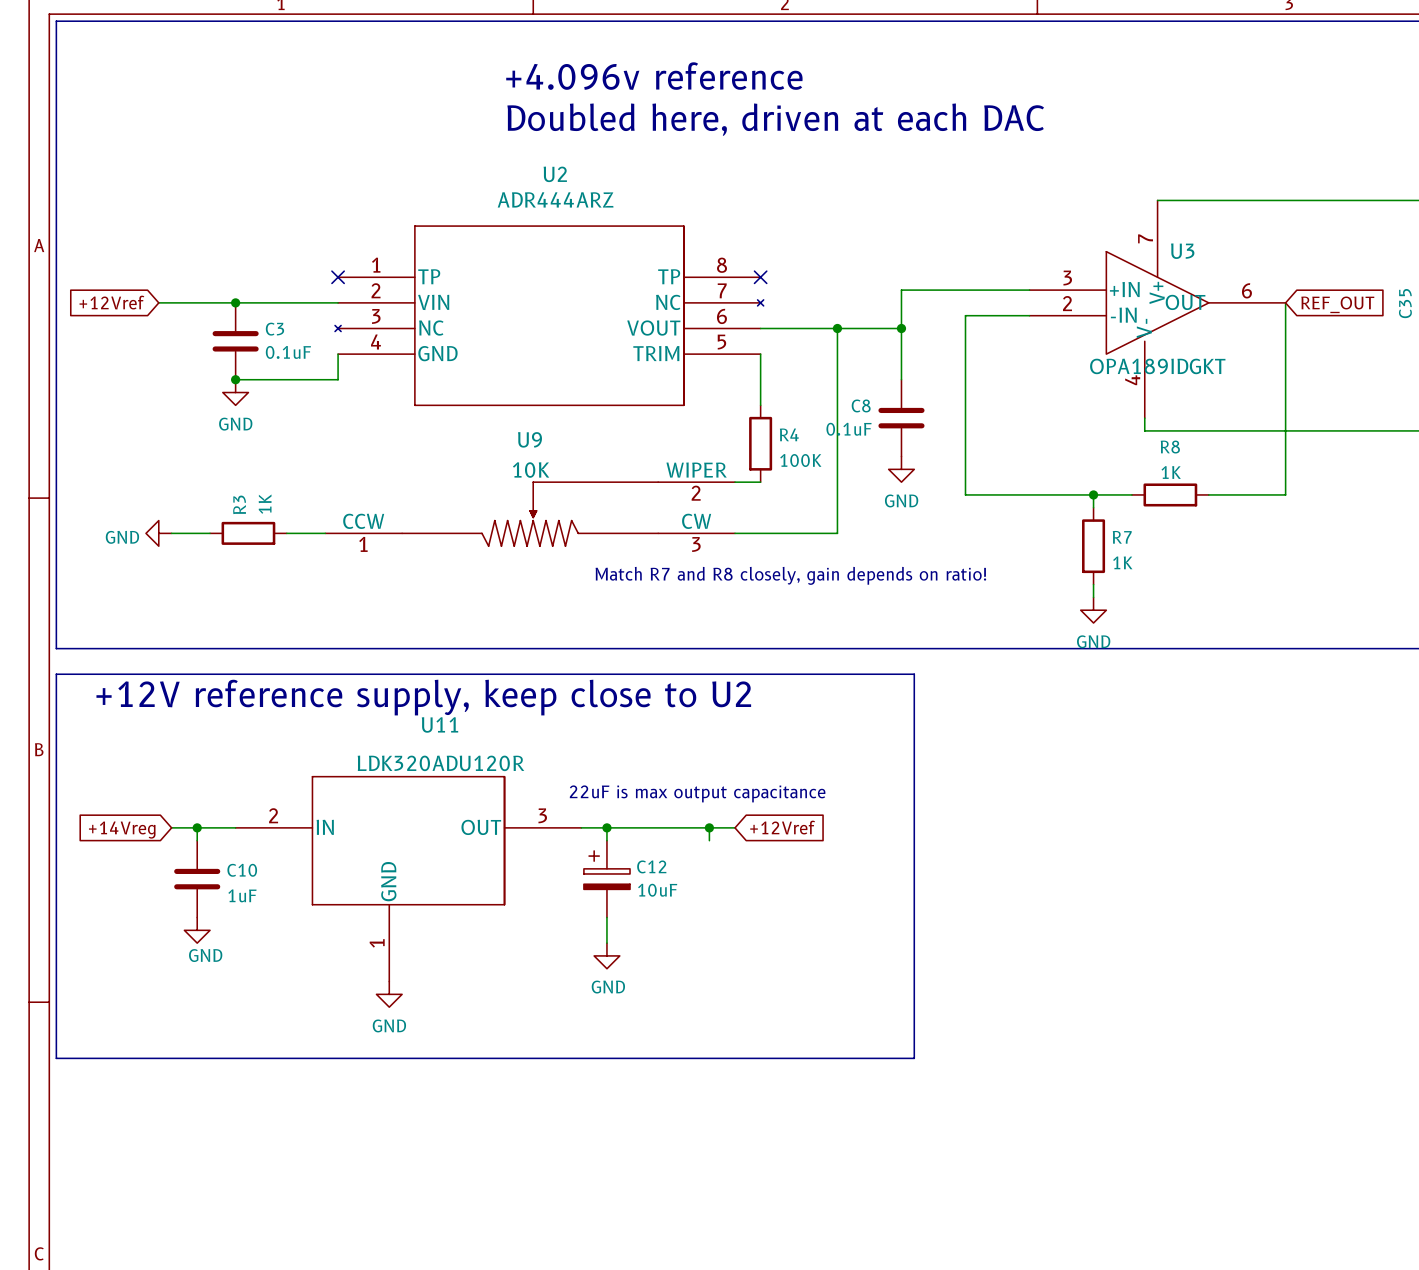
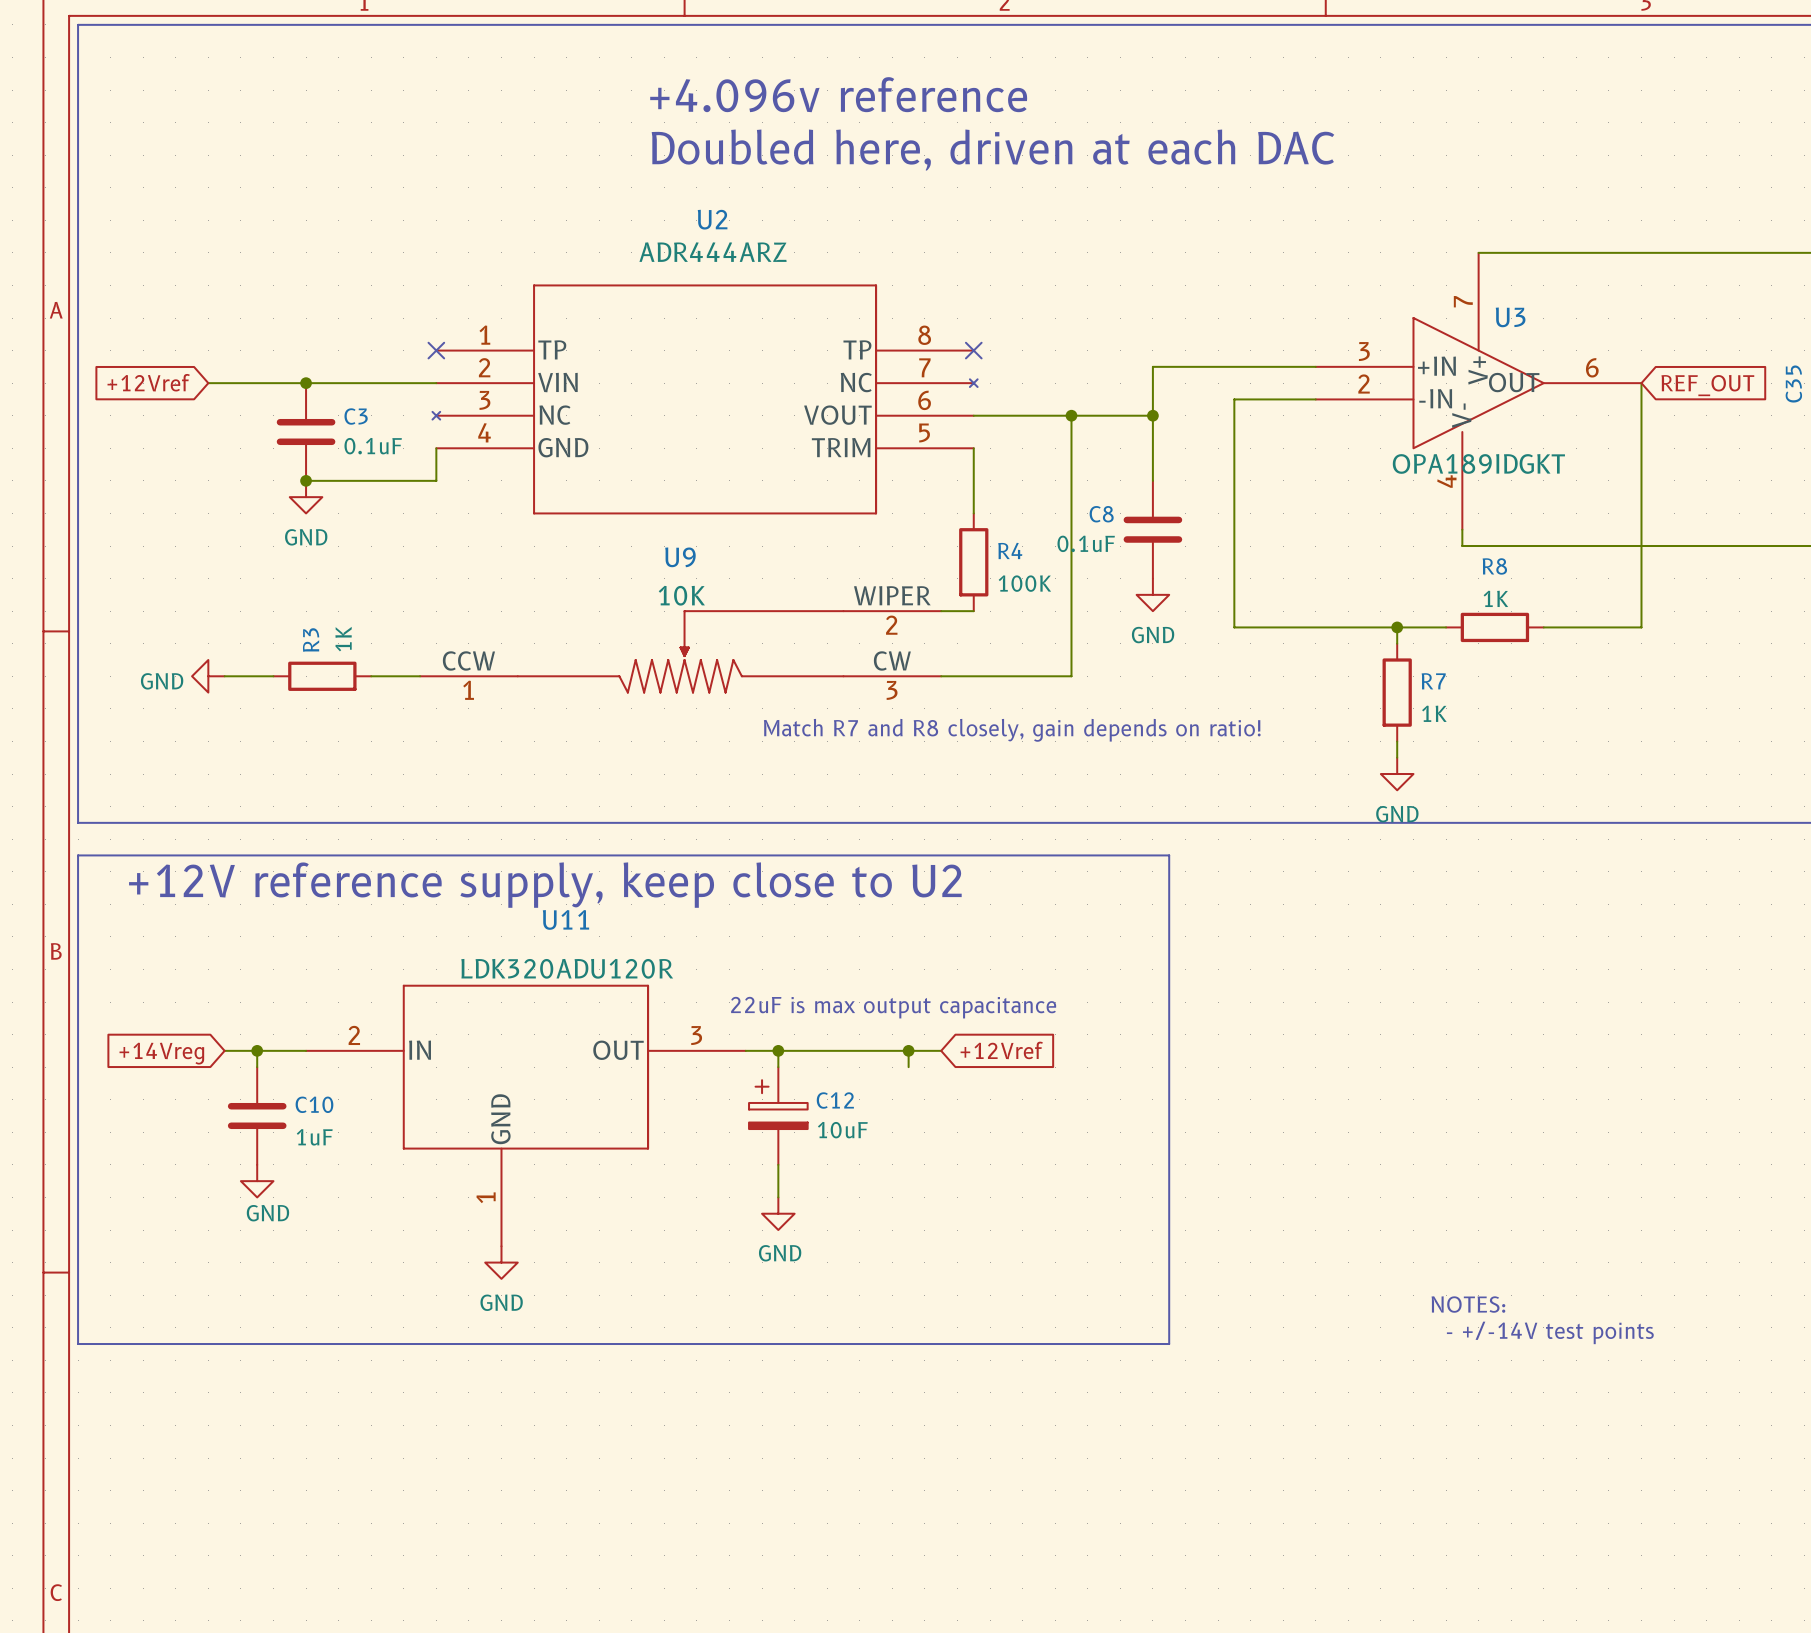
text: none -> NOTES: (1468, 1304)
text: none -> - +/-14V test points (1550, 1332)

